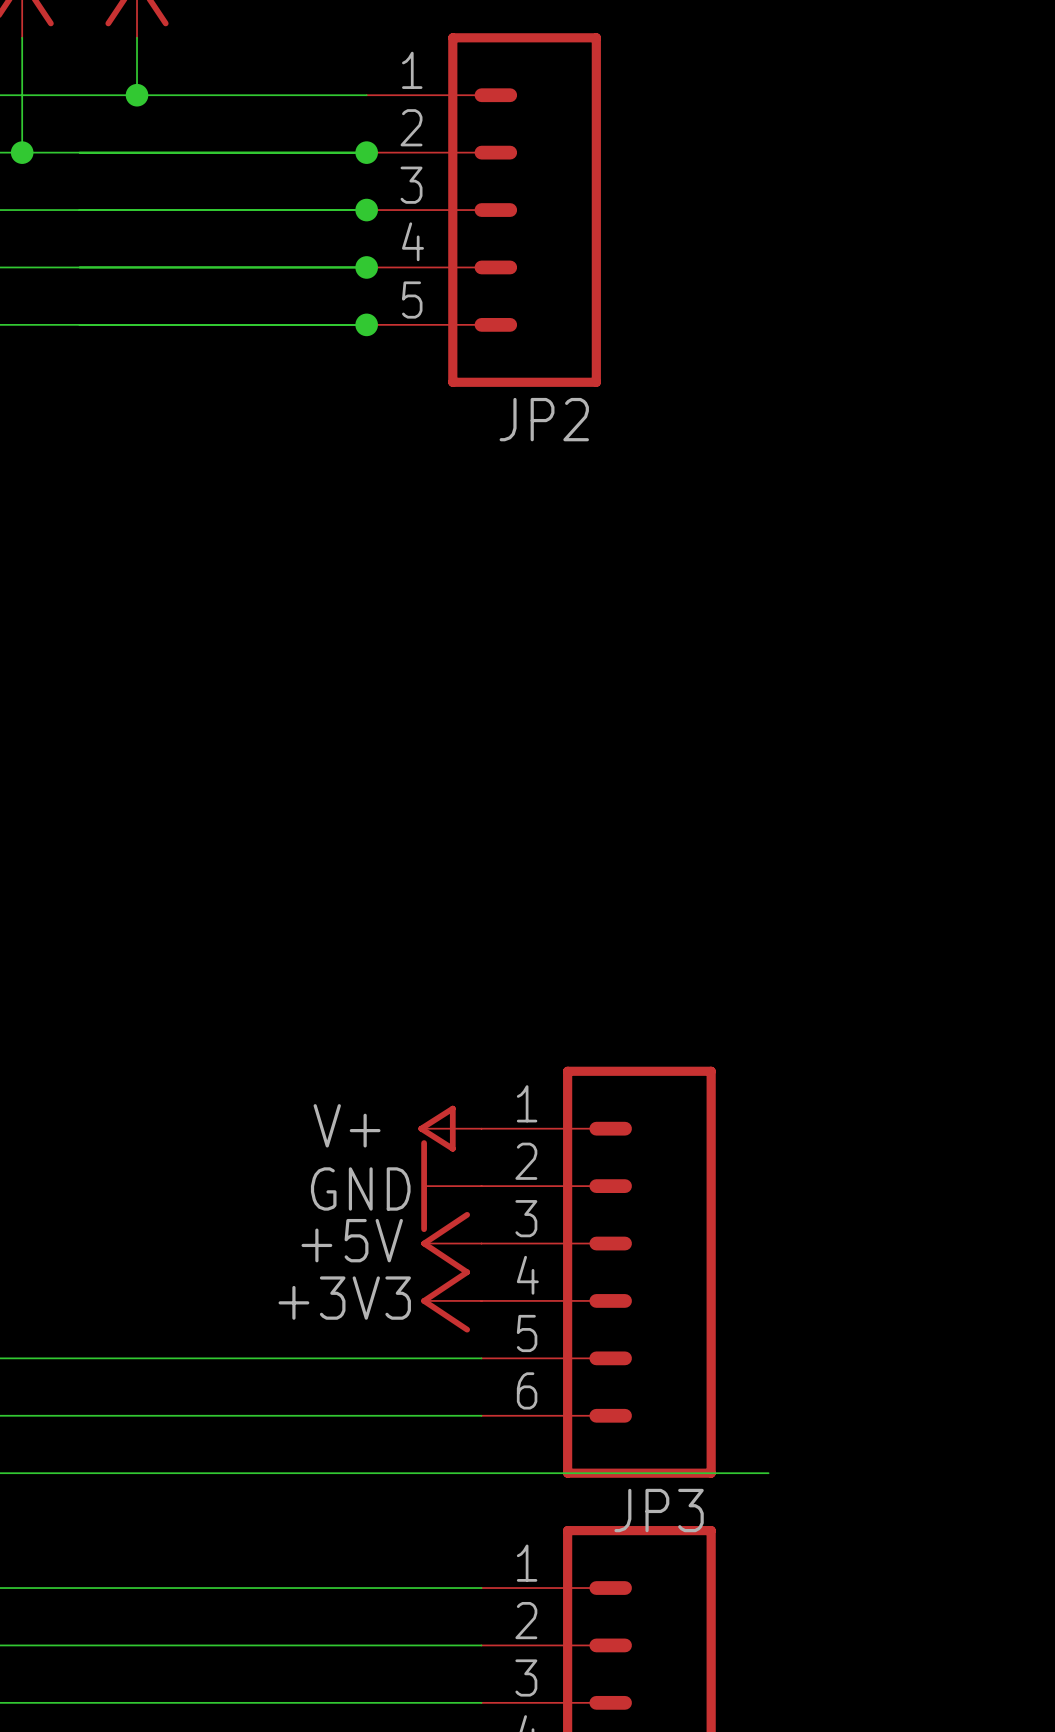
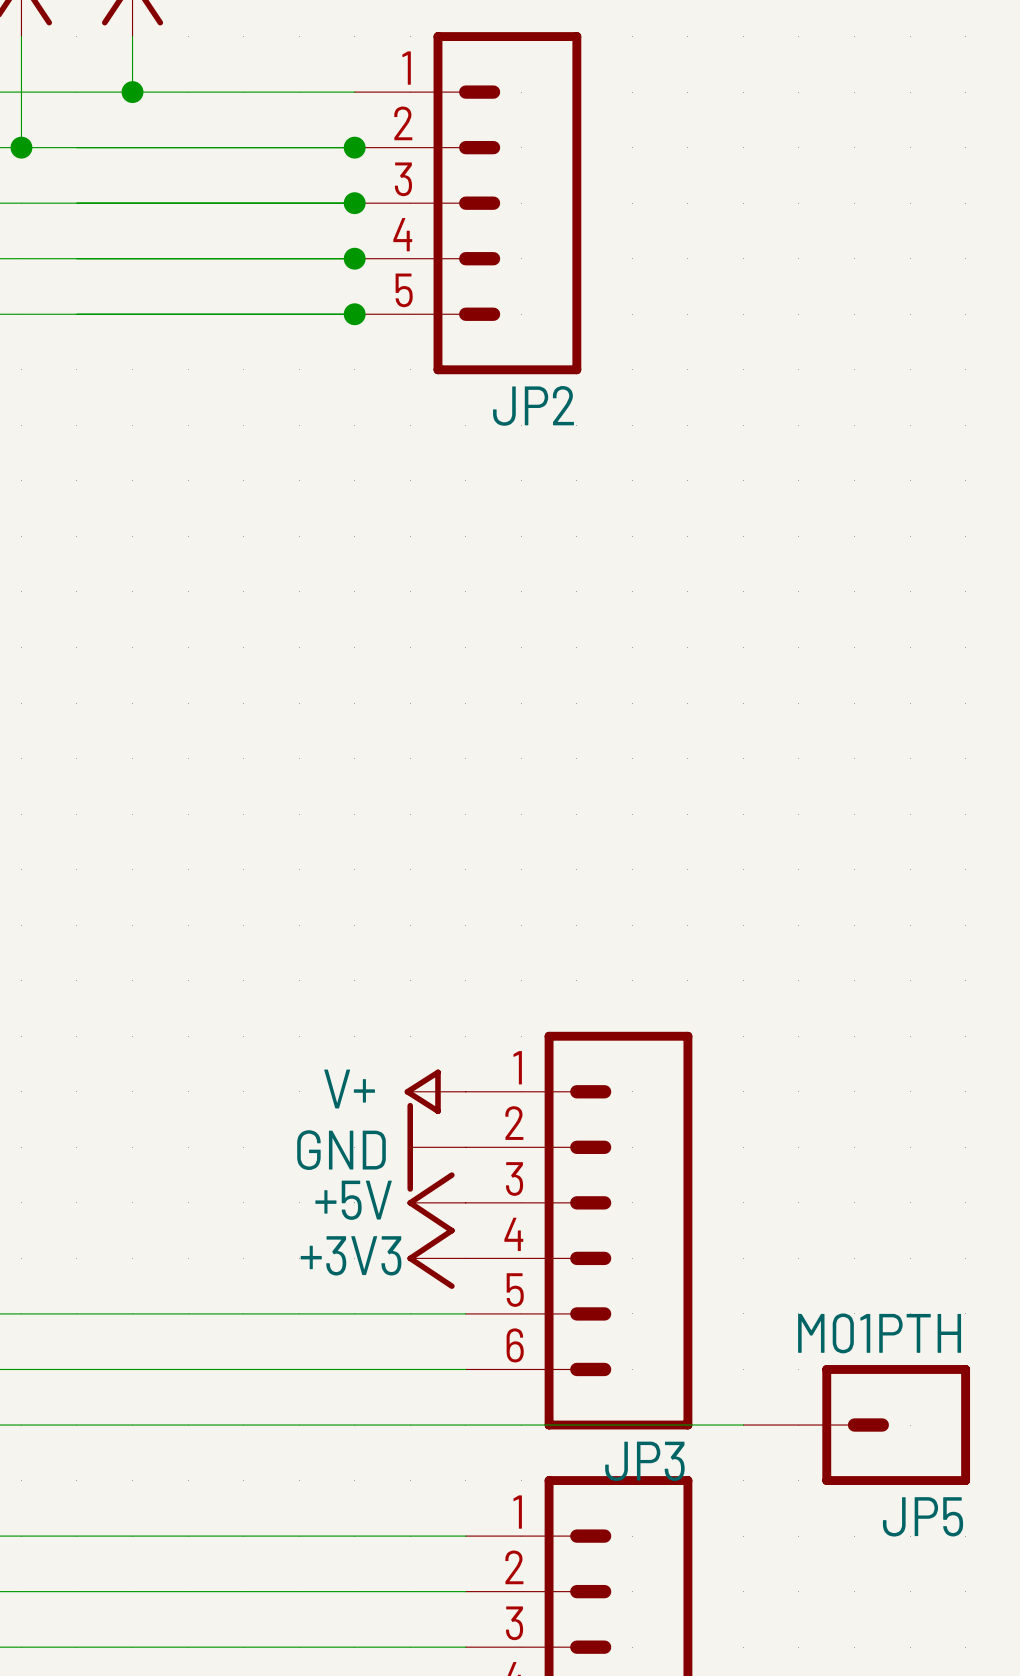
JP5: none -> M01PTH (856, 1425)

